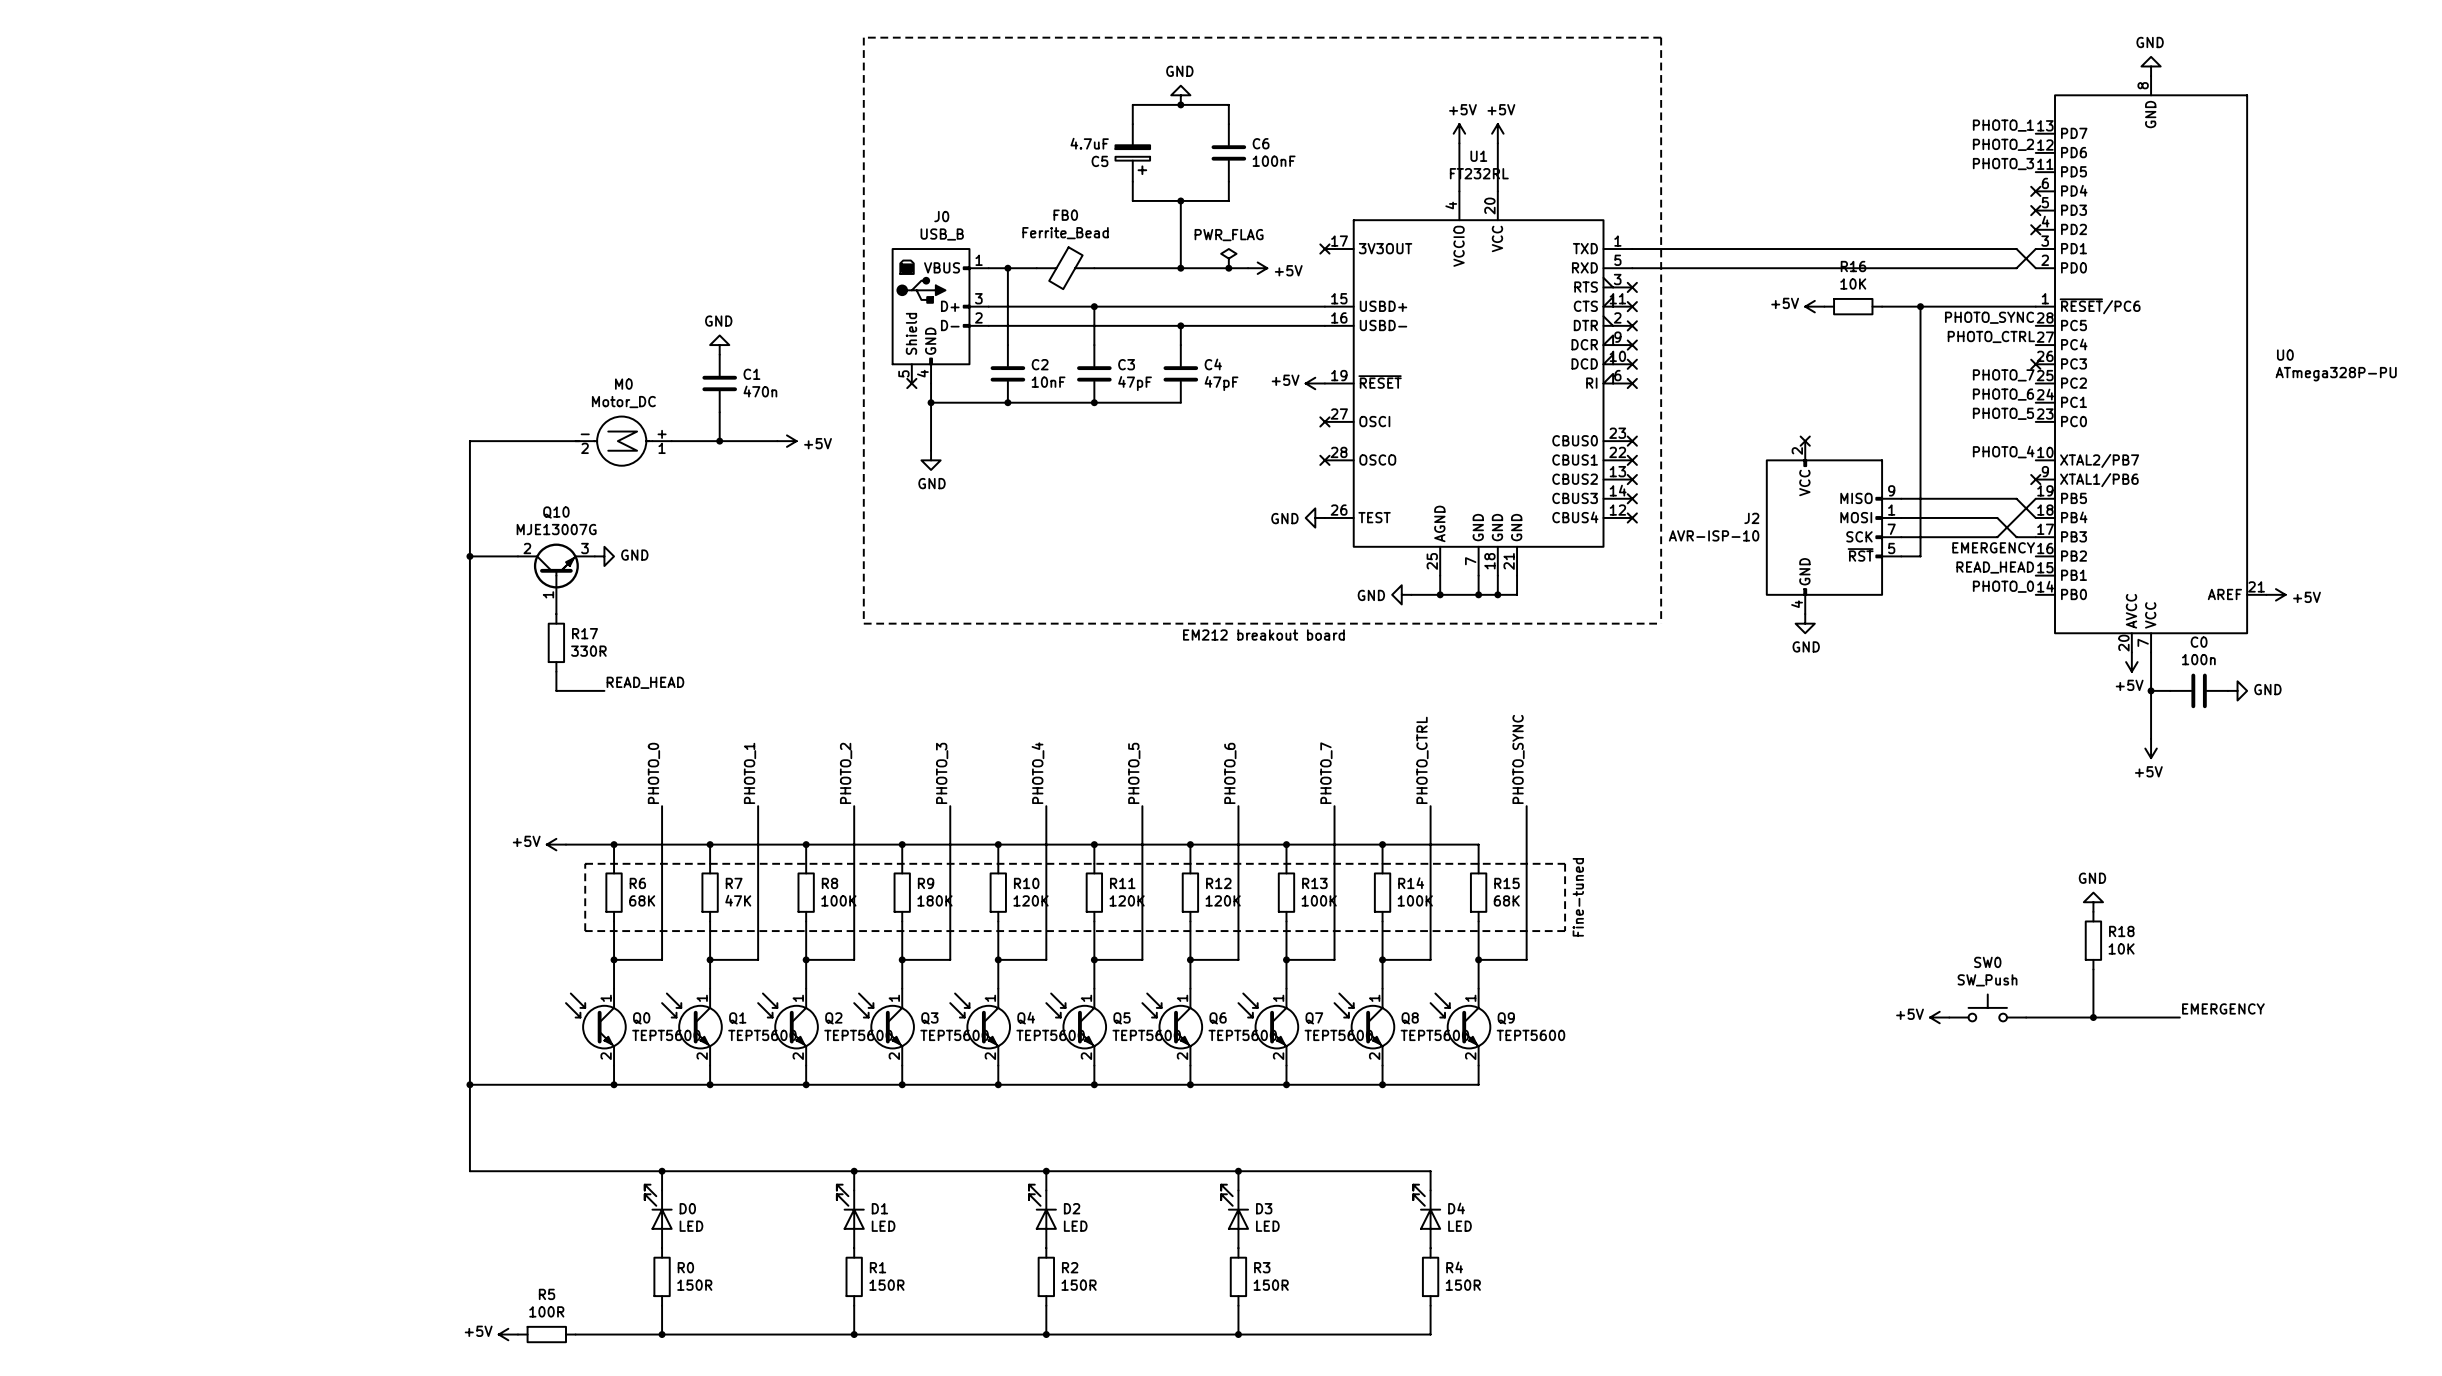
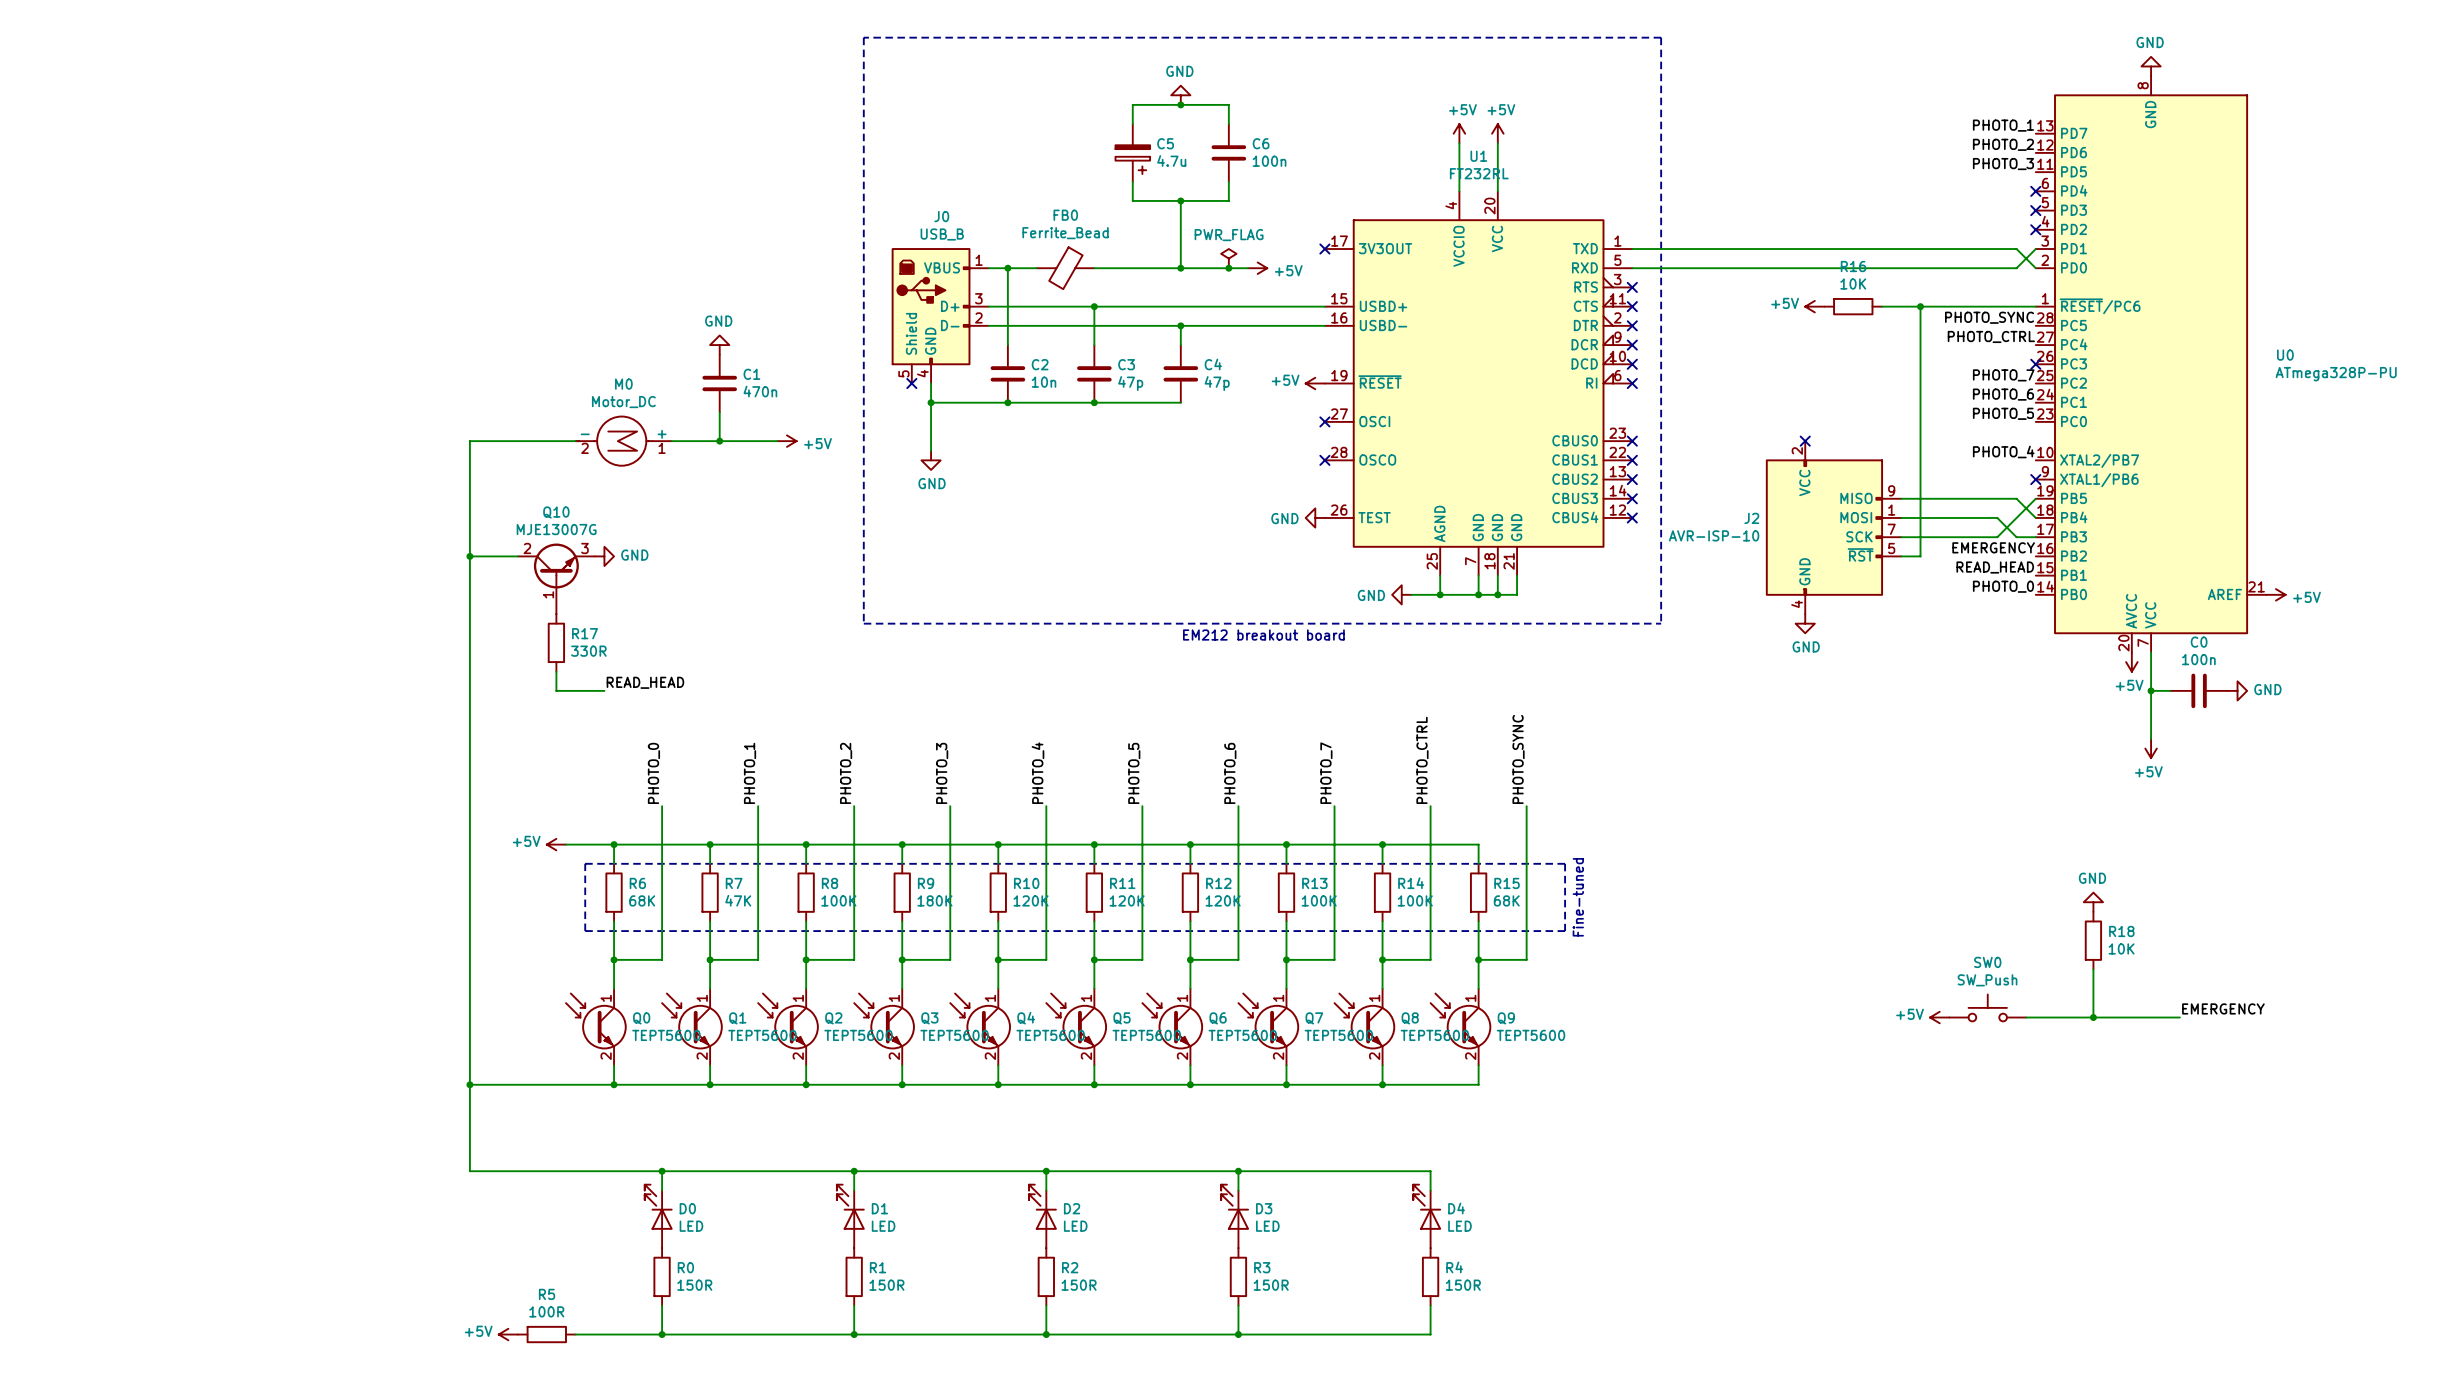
C5 value: 4.7uF (1089, 143) -> 4.7u (1171, 161)
C5 name position: C5 (1099, 161) -> C5 (1165, 143)
C6 value: 100nF (1274, 161) -> 100n (1269, 161)
C2 value: 10nF (1048, 382) -> 10n (1044, 382)
C3 value: 47pF (1135, 383) -> 47p (1130, 383)
C4 value: 47pF (1221, 383) -> 47p (1217, 383)

